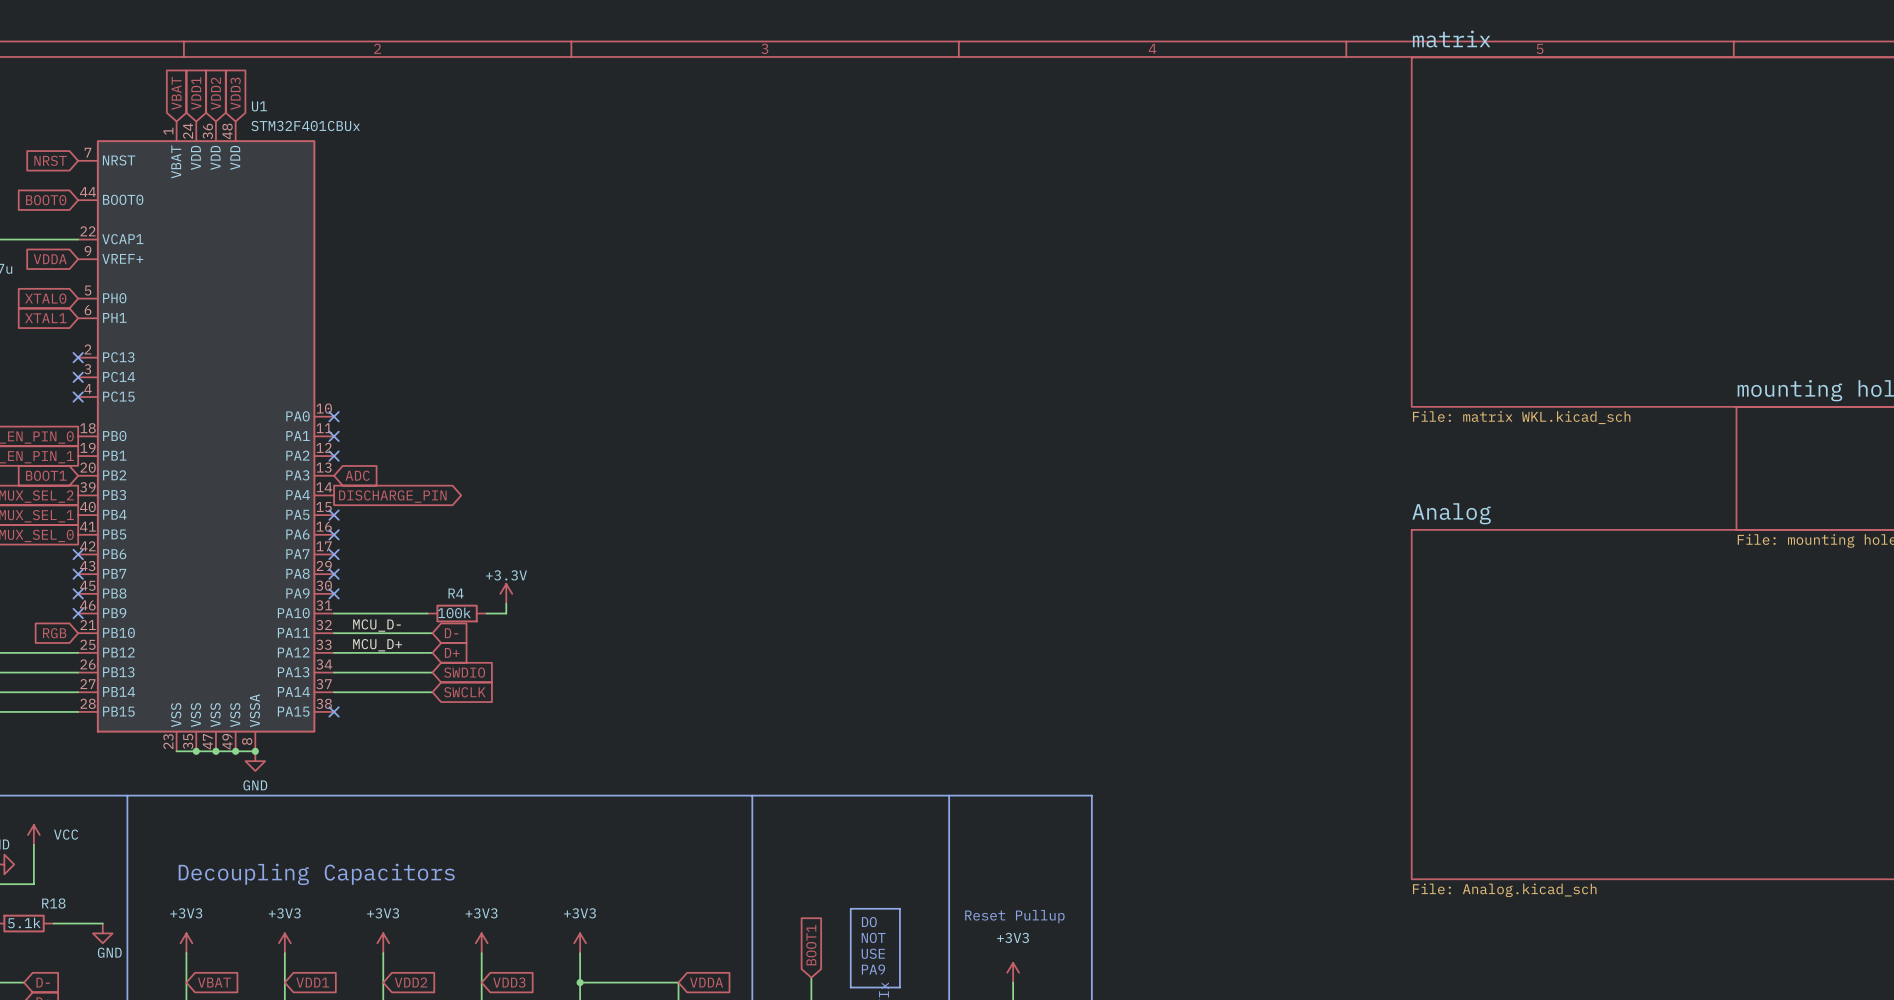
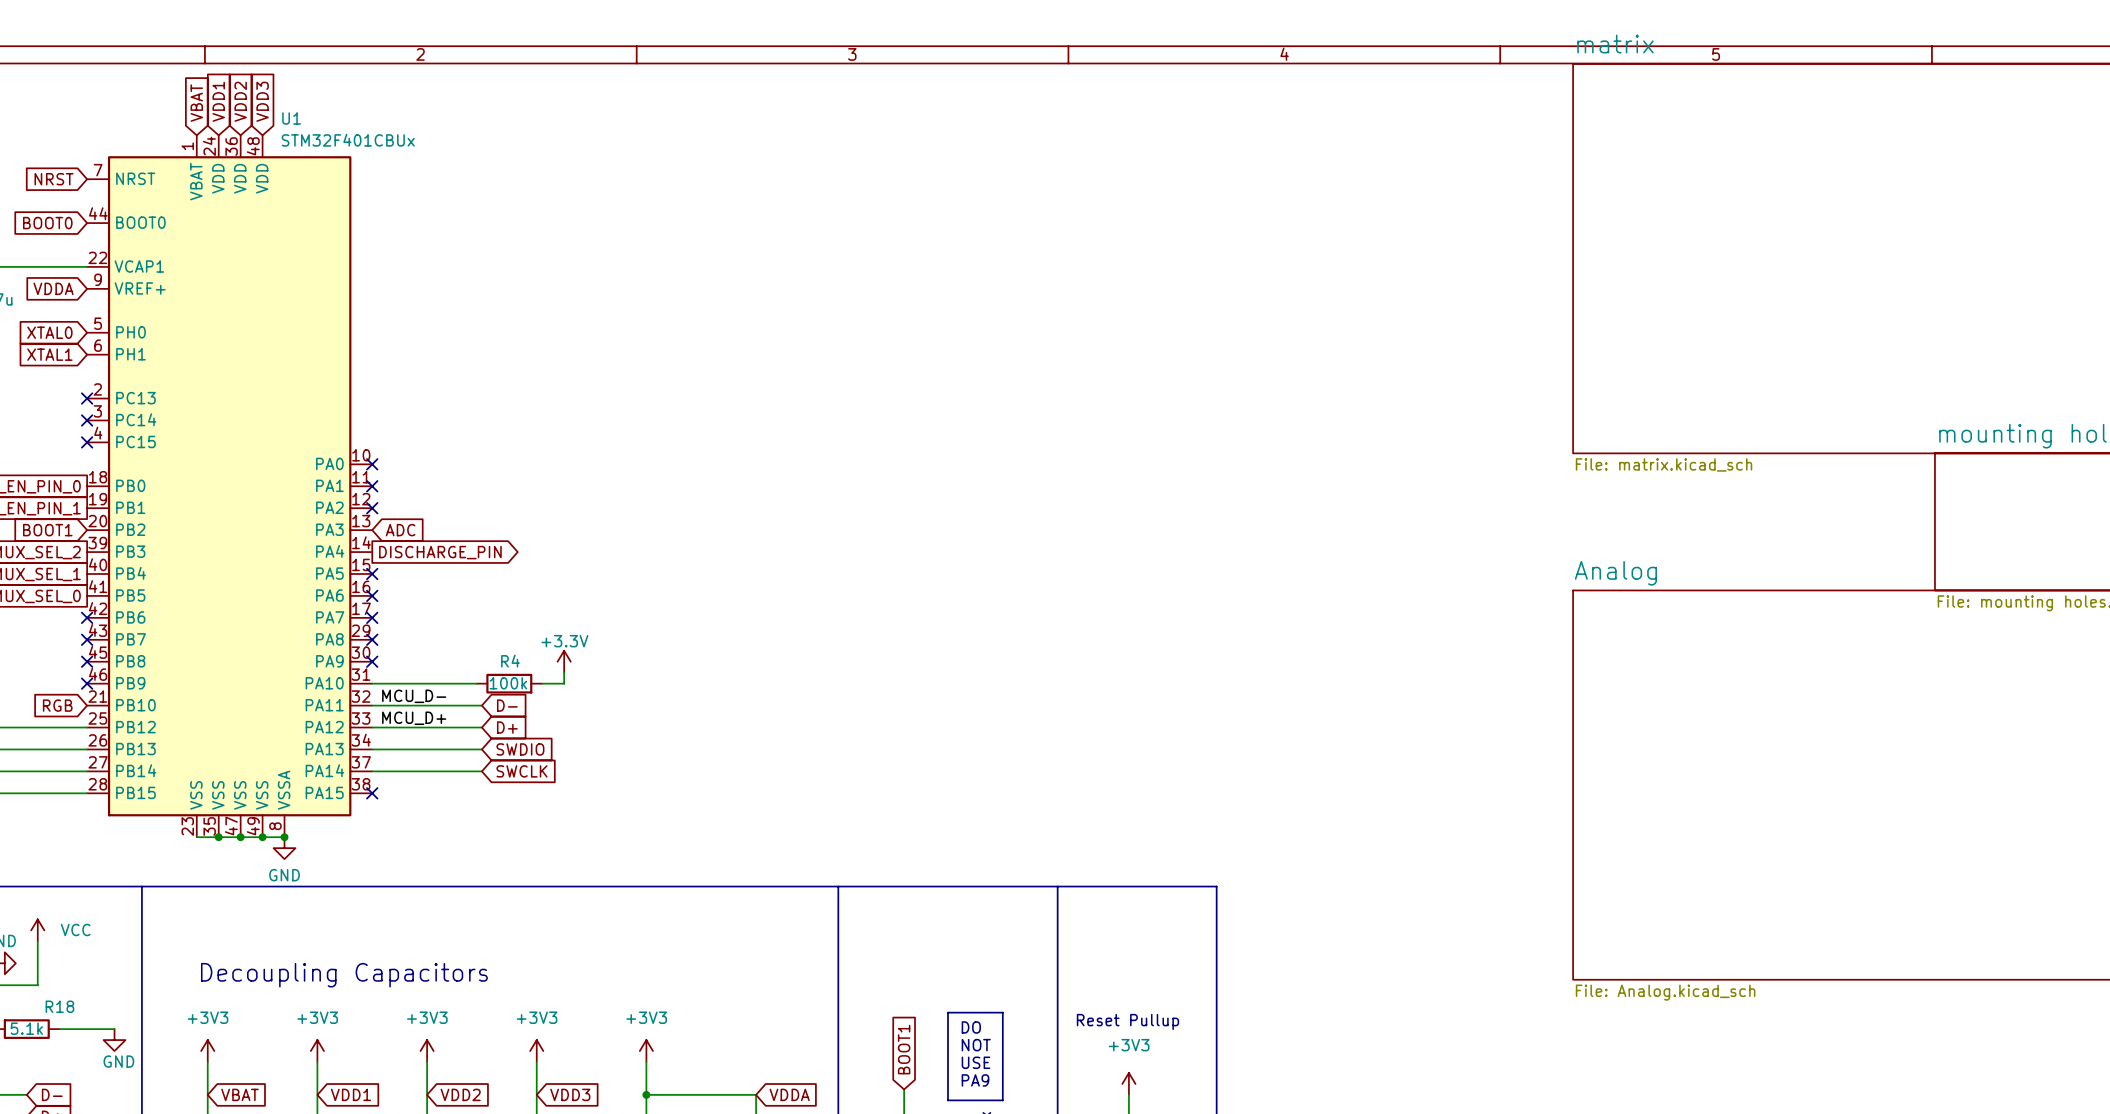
sheet matrix value: File: matrix WKL.kicad_sch (1521, 417) -> File: matrix.kicad_sch (1664, 464)

